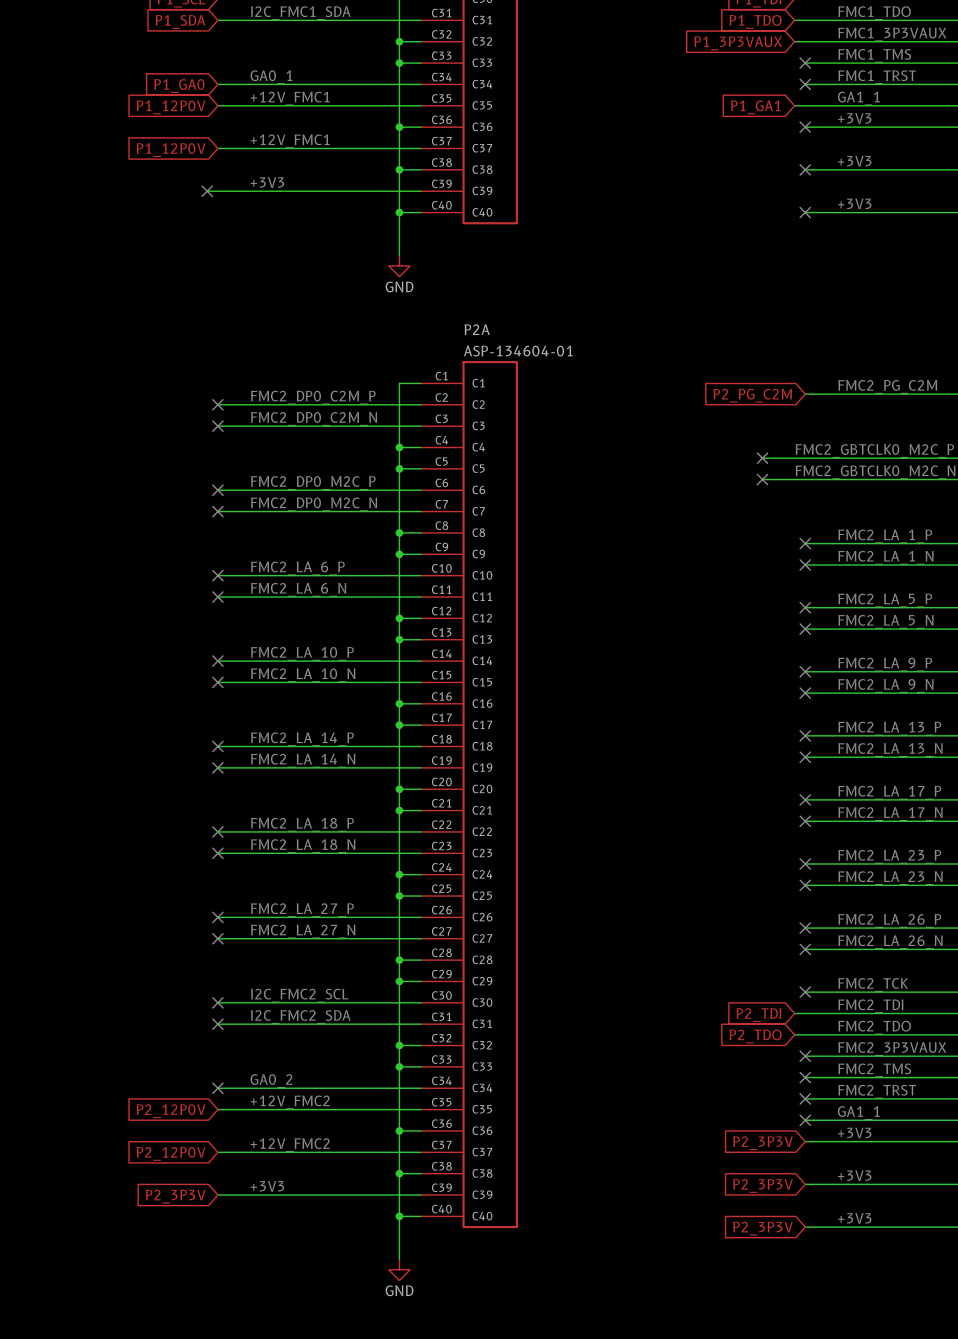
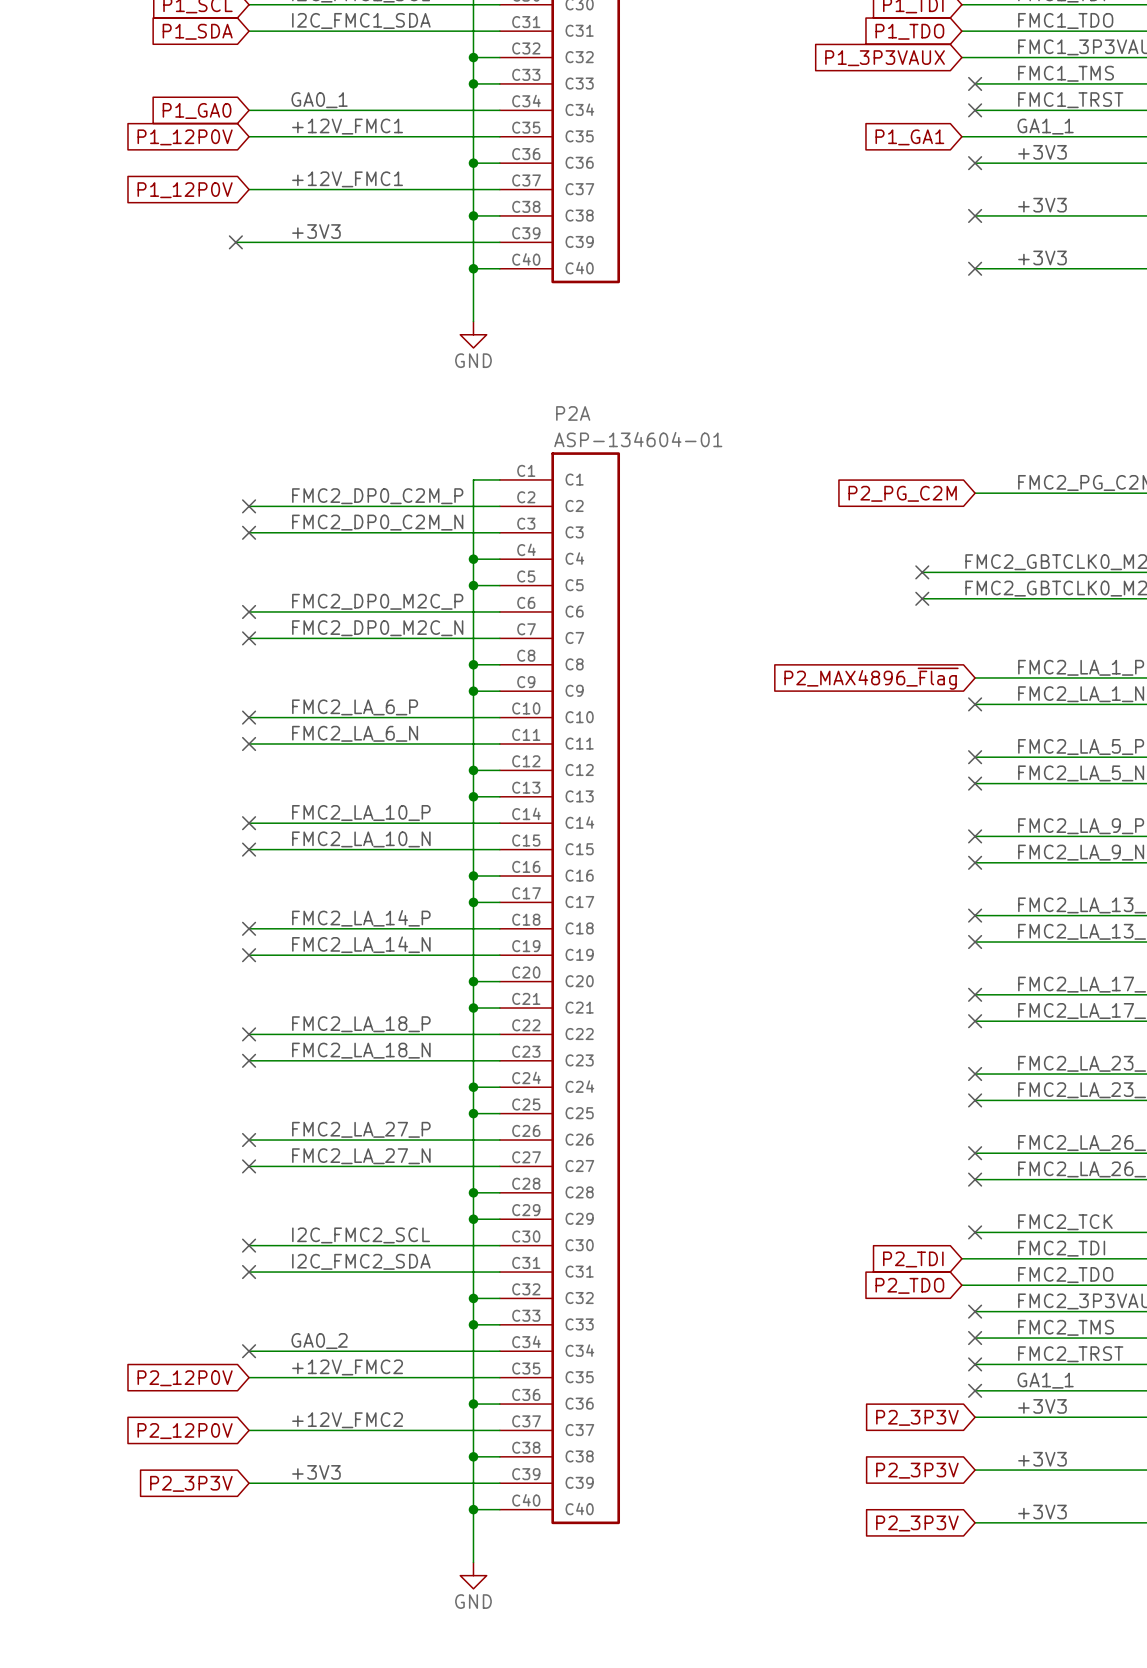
no-connect mark: (805, 543) -> none
global label: none -> P2_MAX4896_~{Flag} (871, 678)

